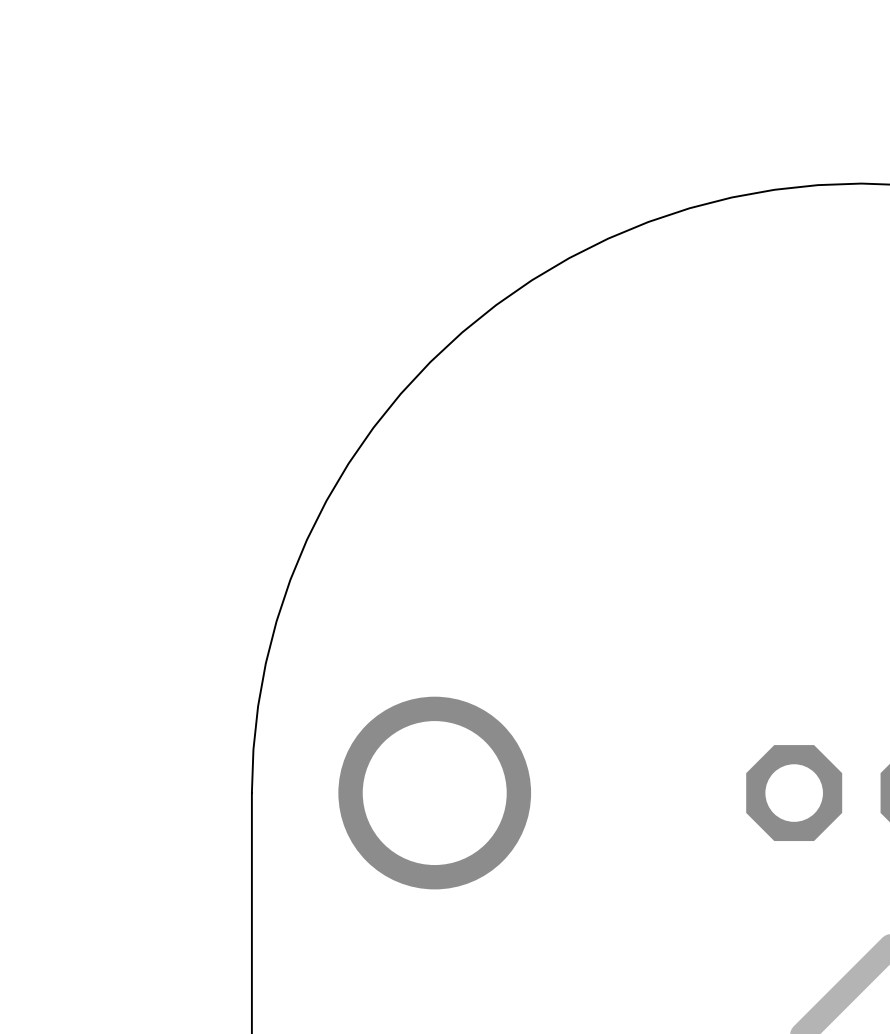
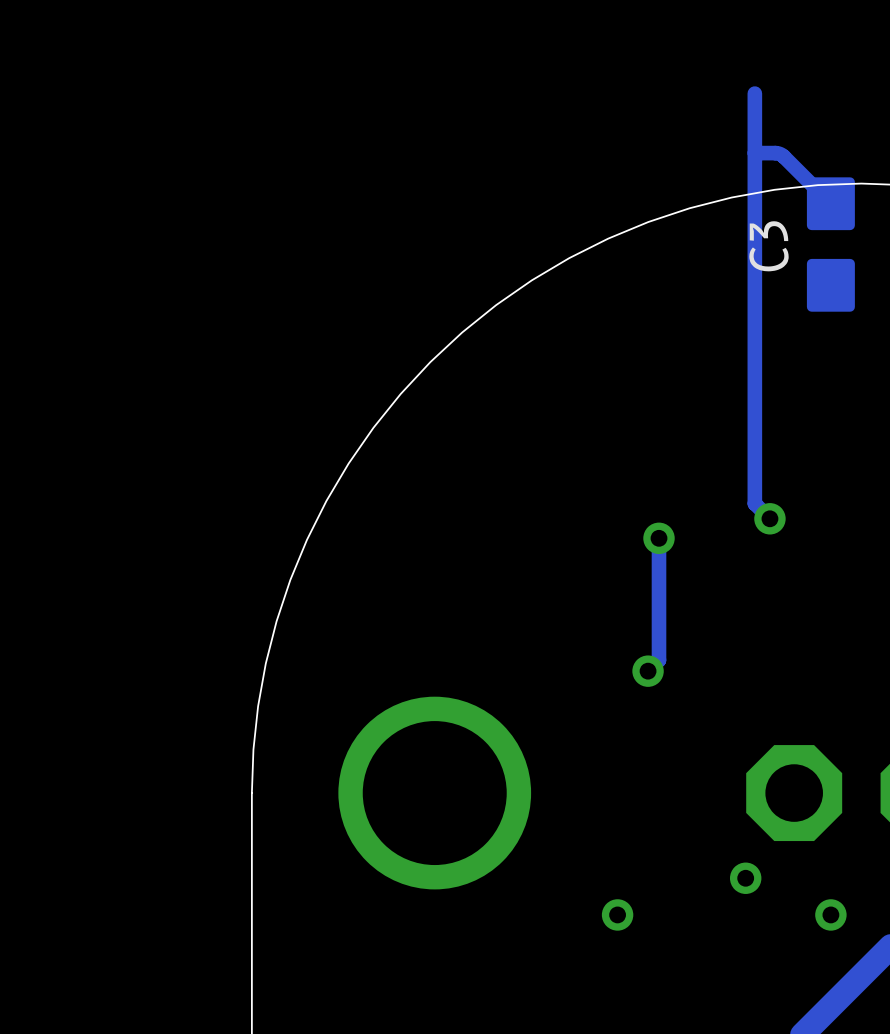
track: none -> (754, 93) (754, 503) (769, 518)
track: none -> (754, 153) (781, 154) (830, 203)
C3: none -> (830, 244)
via: none -> (769, 518)
track: none -> (659, 538) (659, 660) (648, 671)
via: none -> (659, 538)
via: none -> (648, 671)
via: none -> (745, 878)
via: none -> (617, 914)
via: none -> (830, 914)

